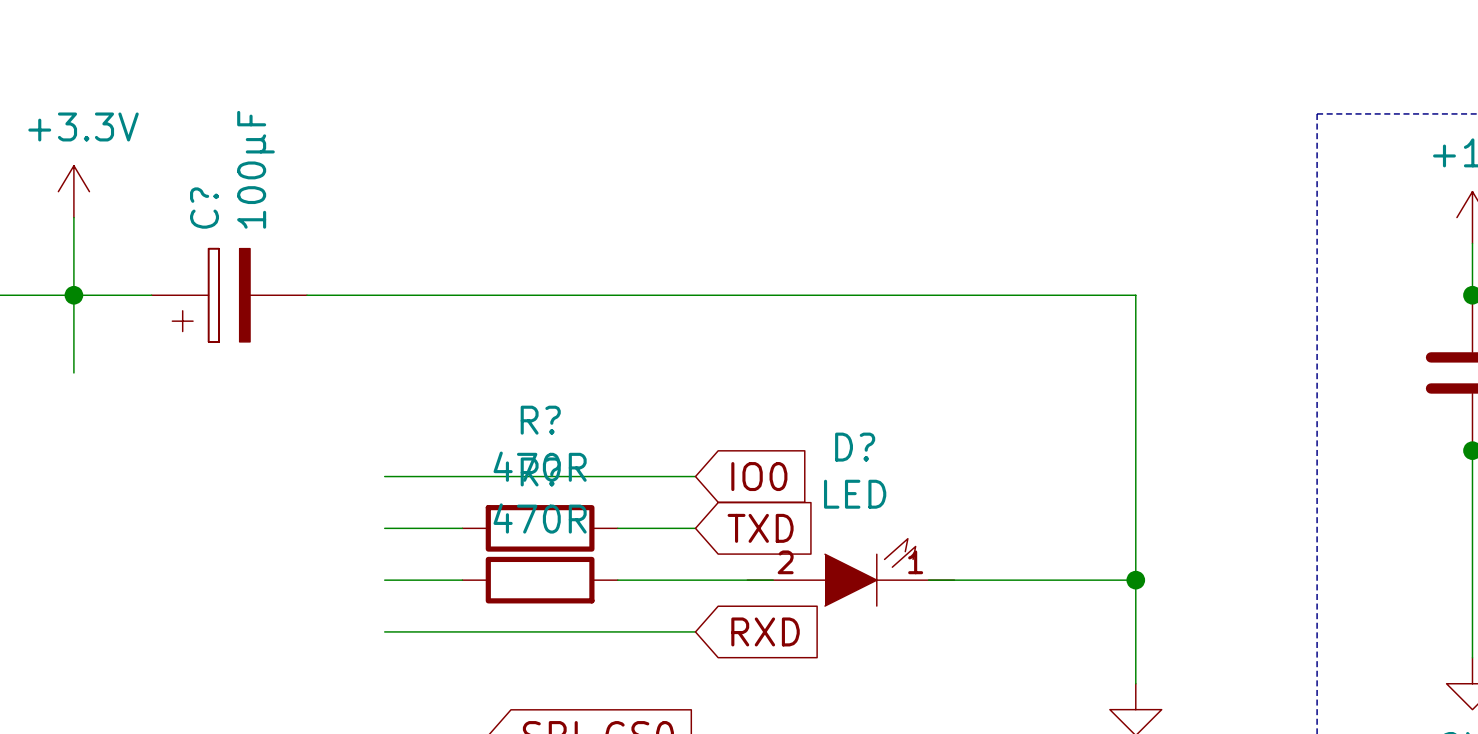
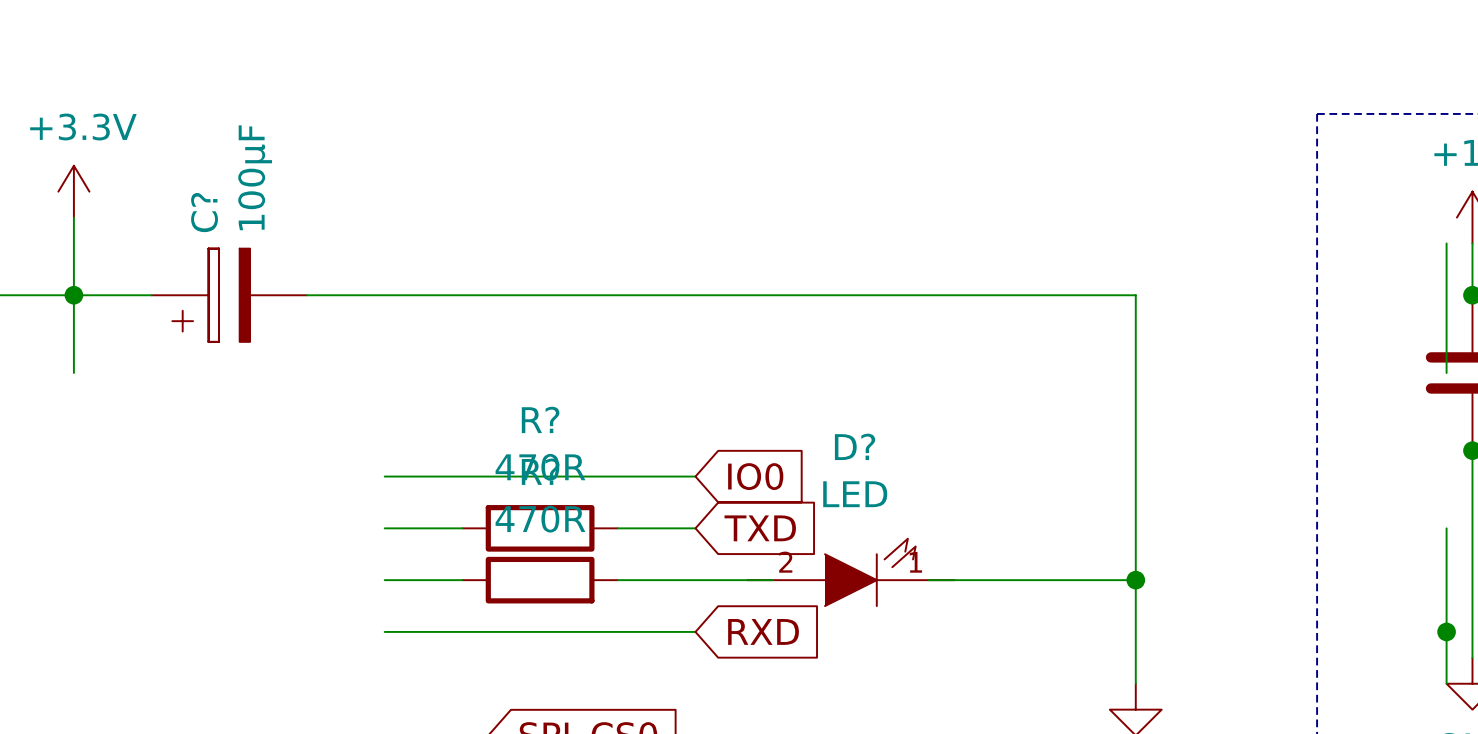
wire: none -> (1446, 243) (1446, 372)
wire: none -> (1446, 528) (1446, 683)
junction: none -> (1446, 631)

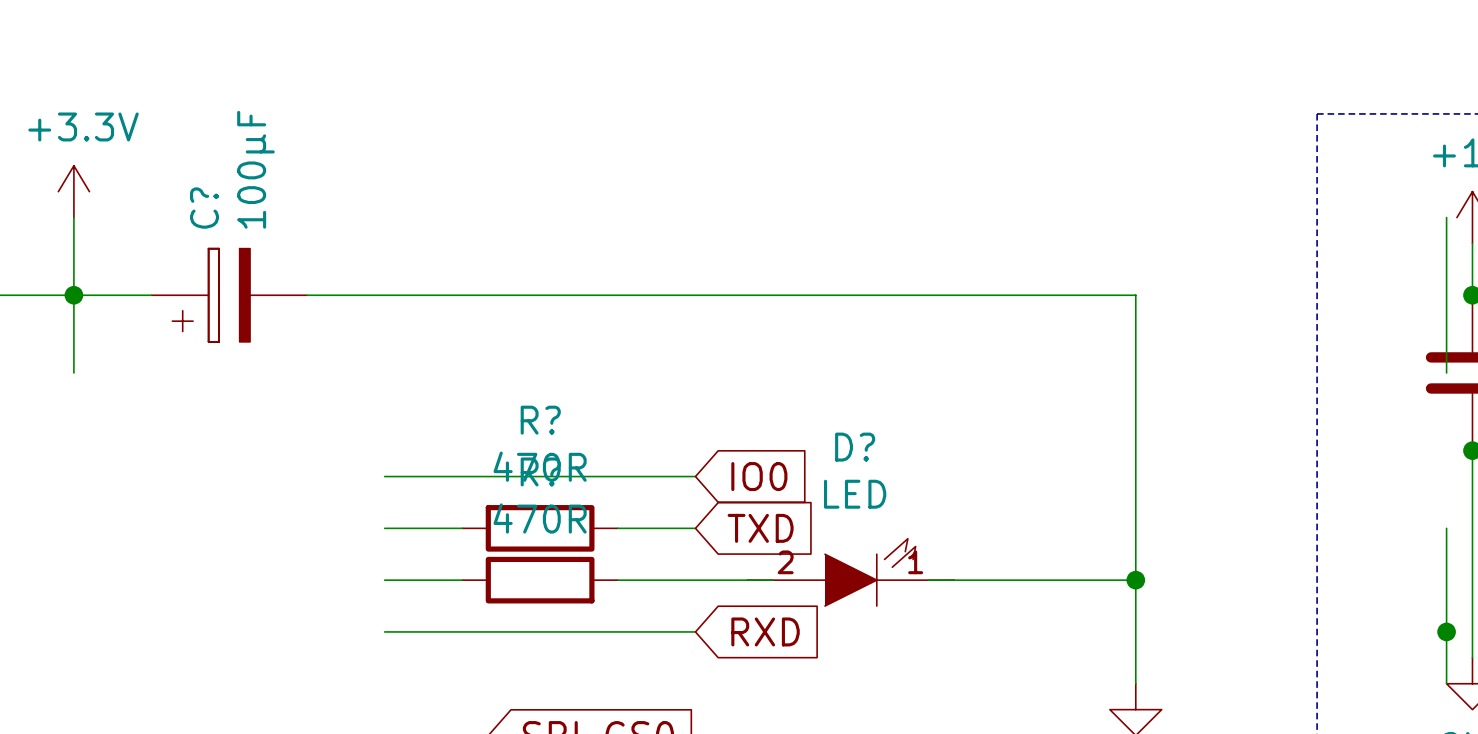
wire: none -> (1446, 217) (1446, 243)

